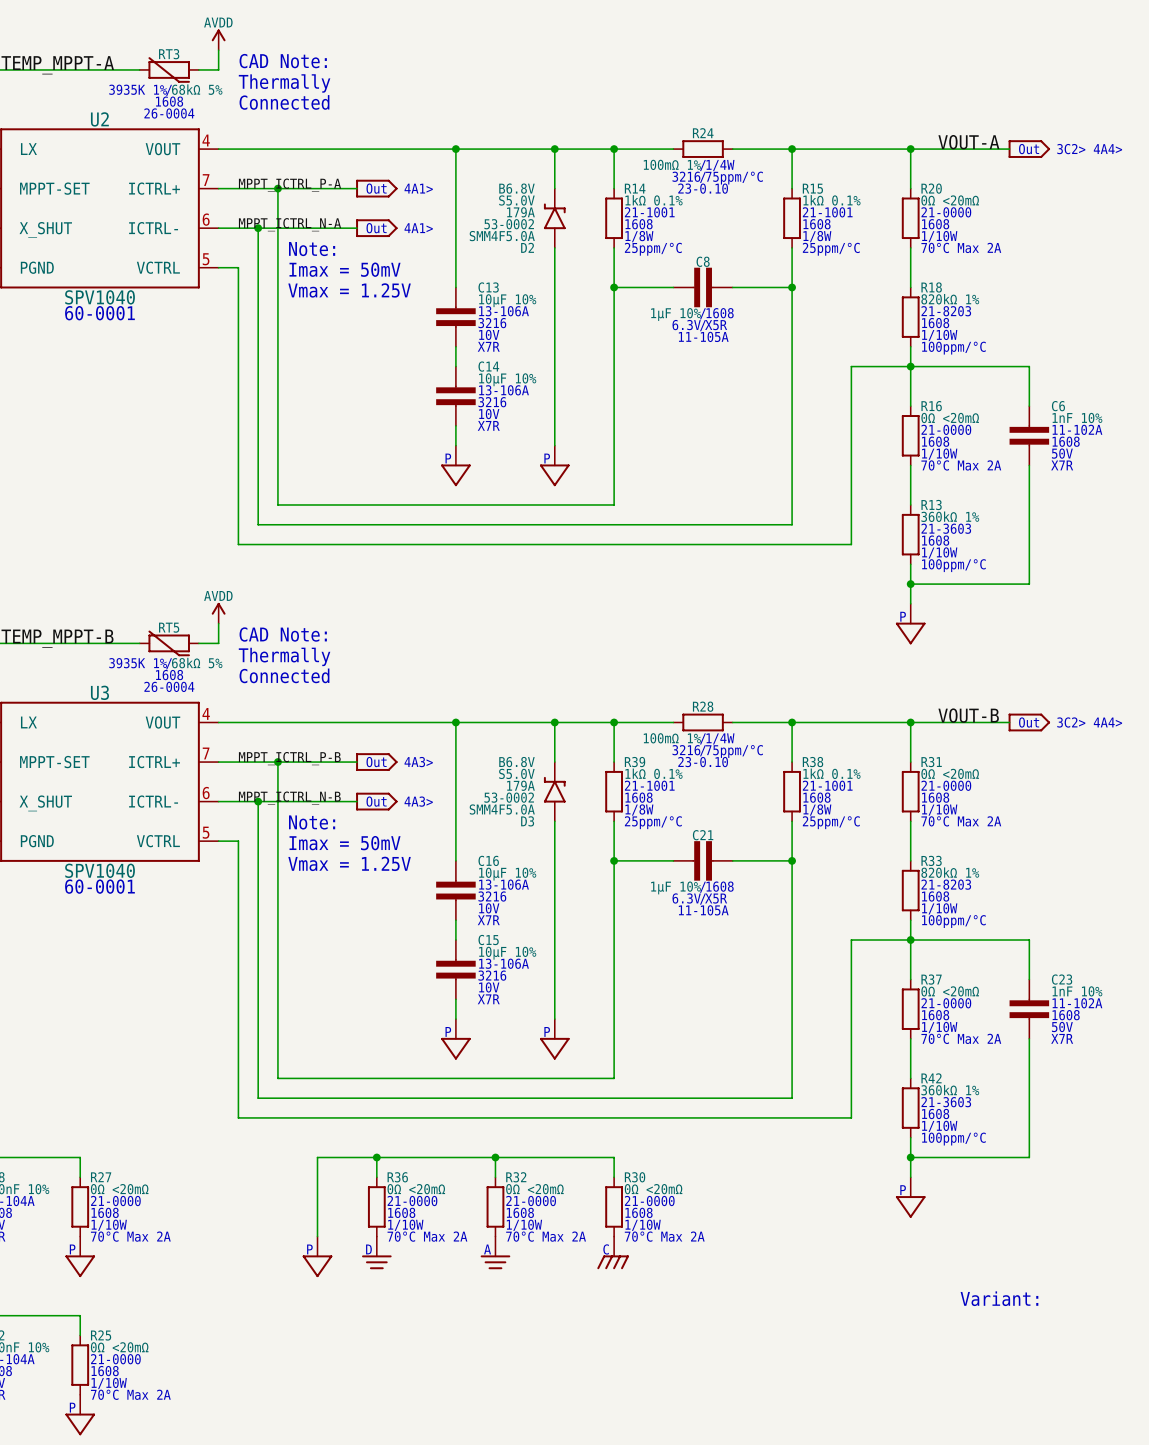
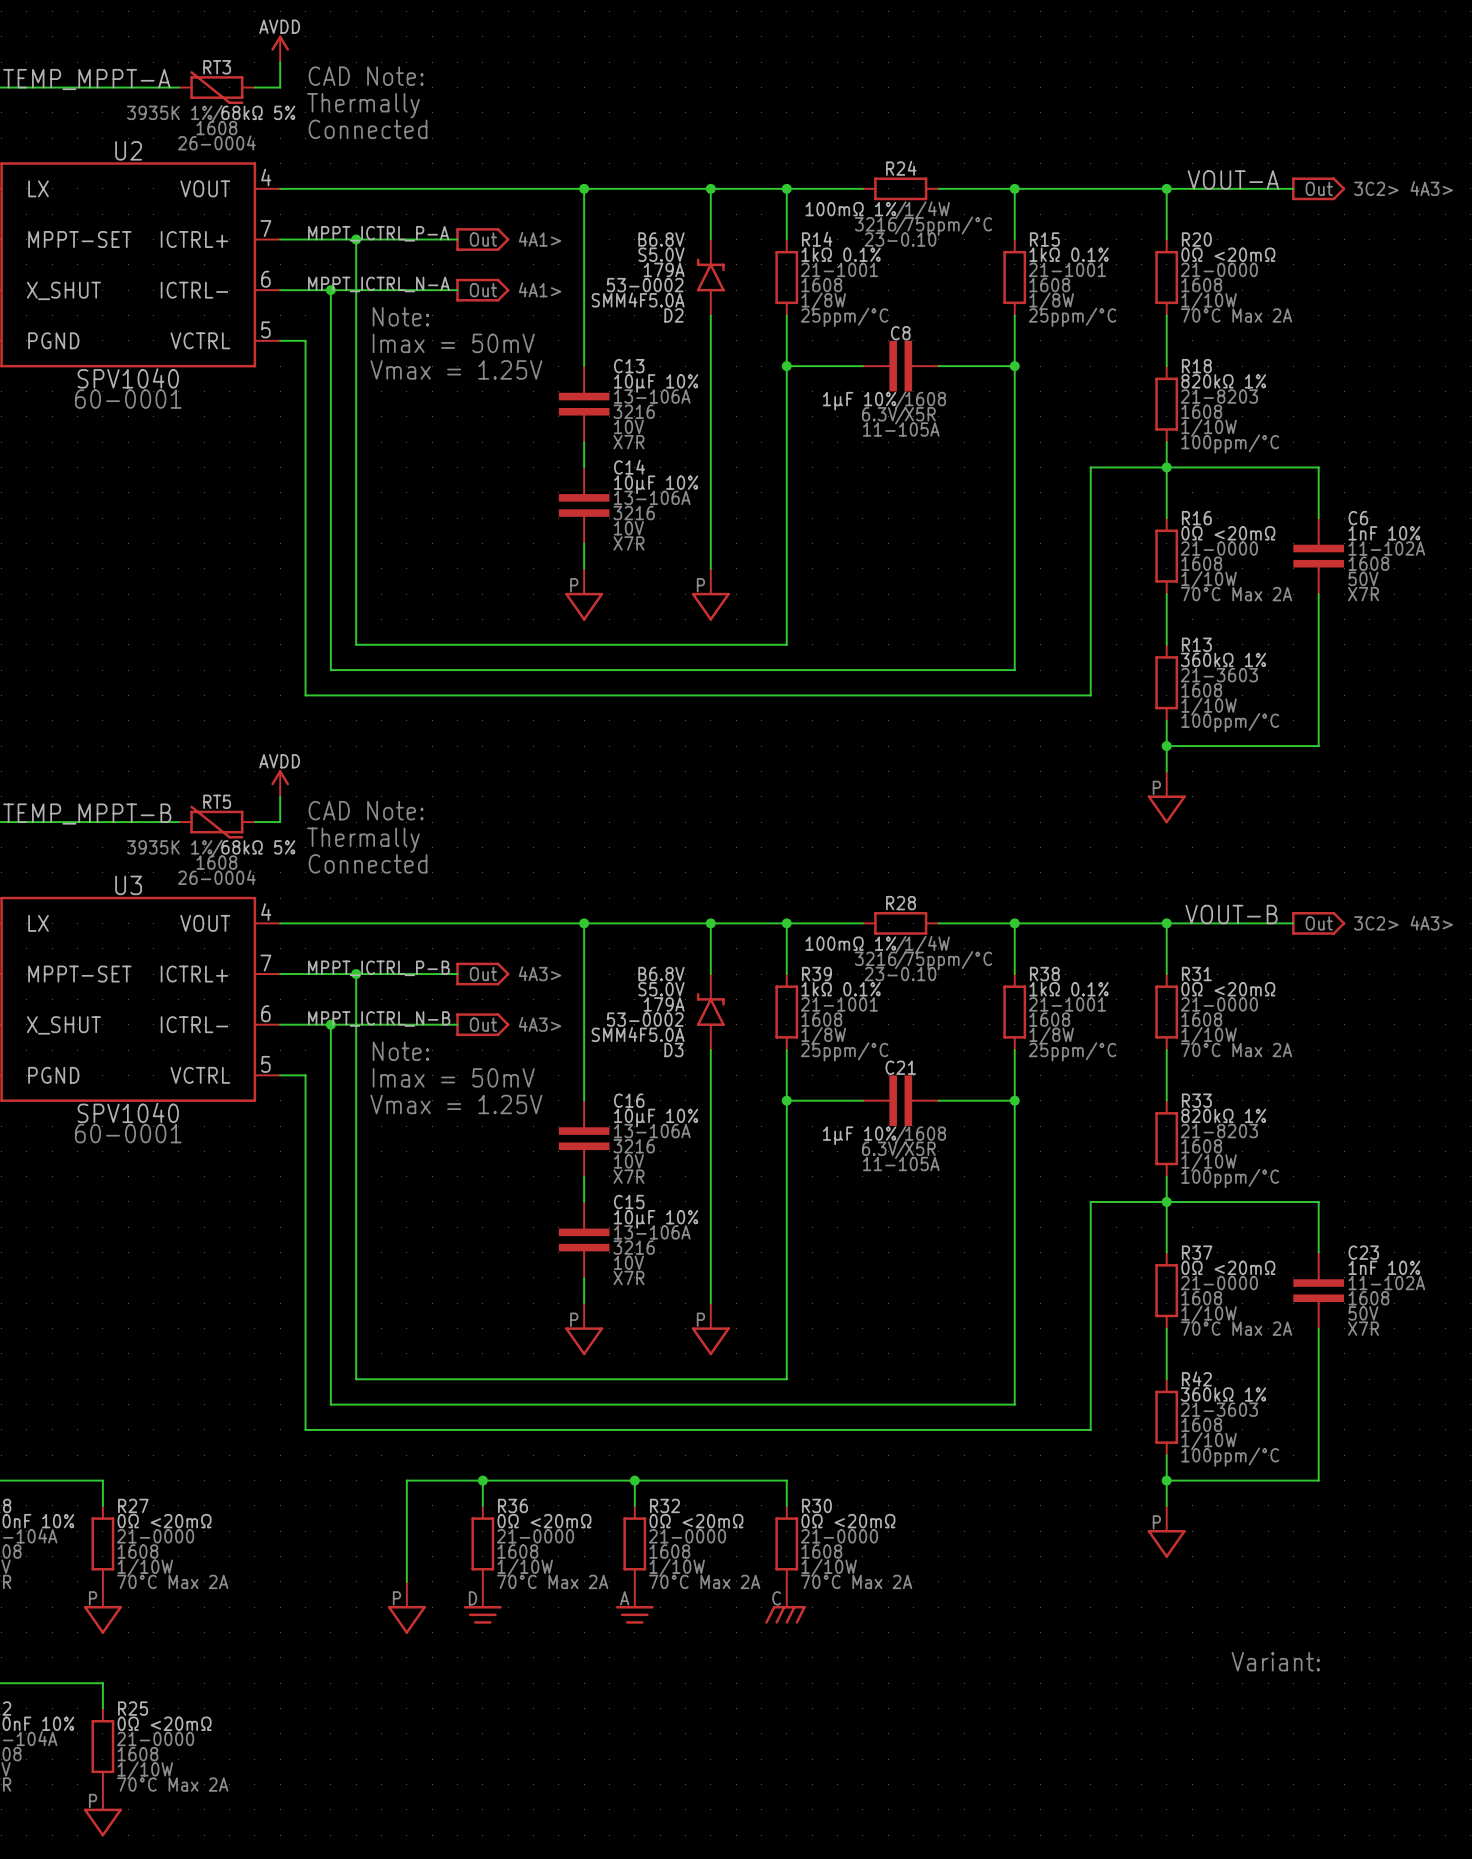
text: 3C2> 4A4> (1089, 149) -> 3C2> 4A3> (1403, 188)
text: 3C2> 4A4> (1089, 722) -> 3C2> 4A3> (1403, 923)

